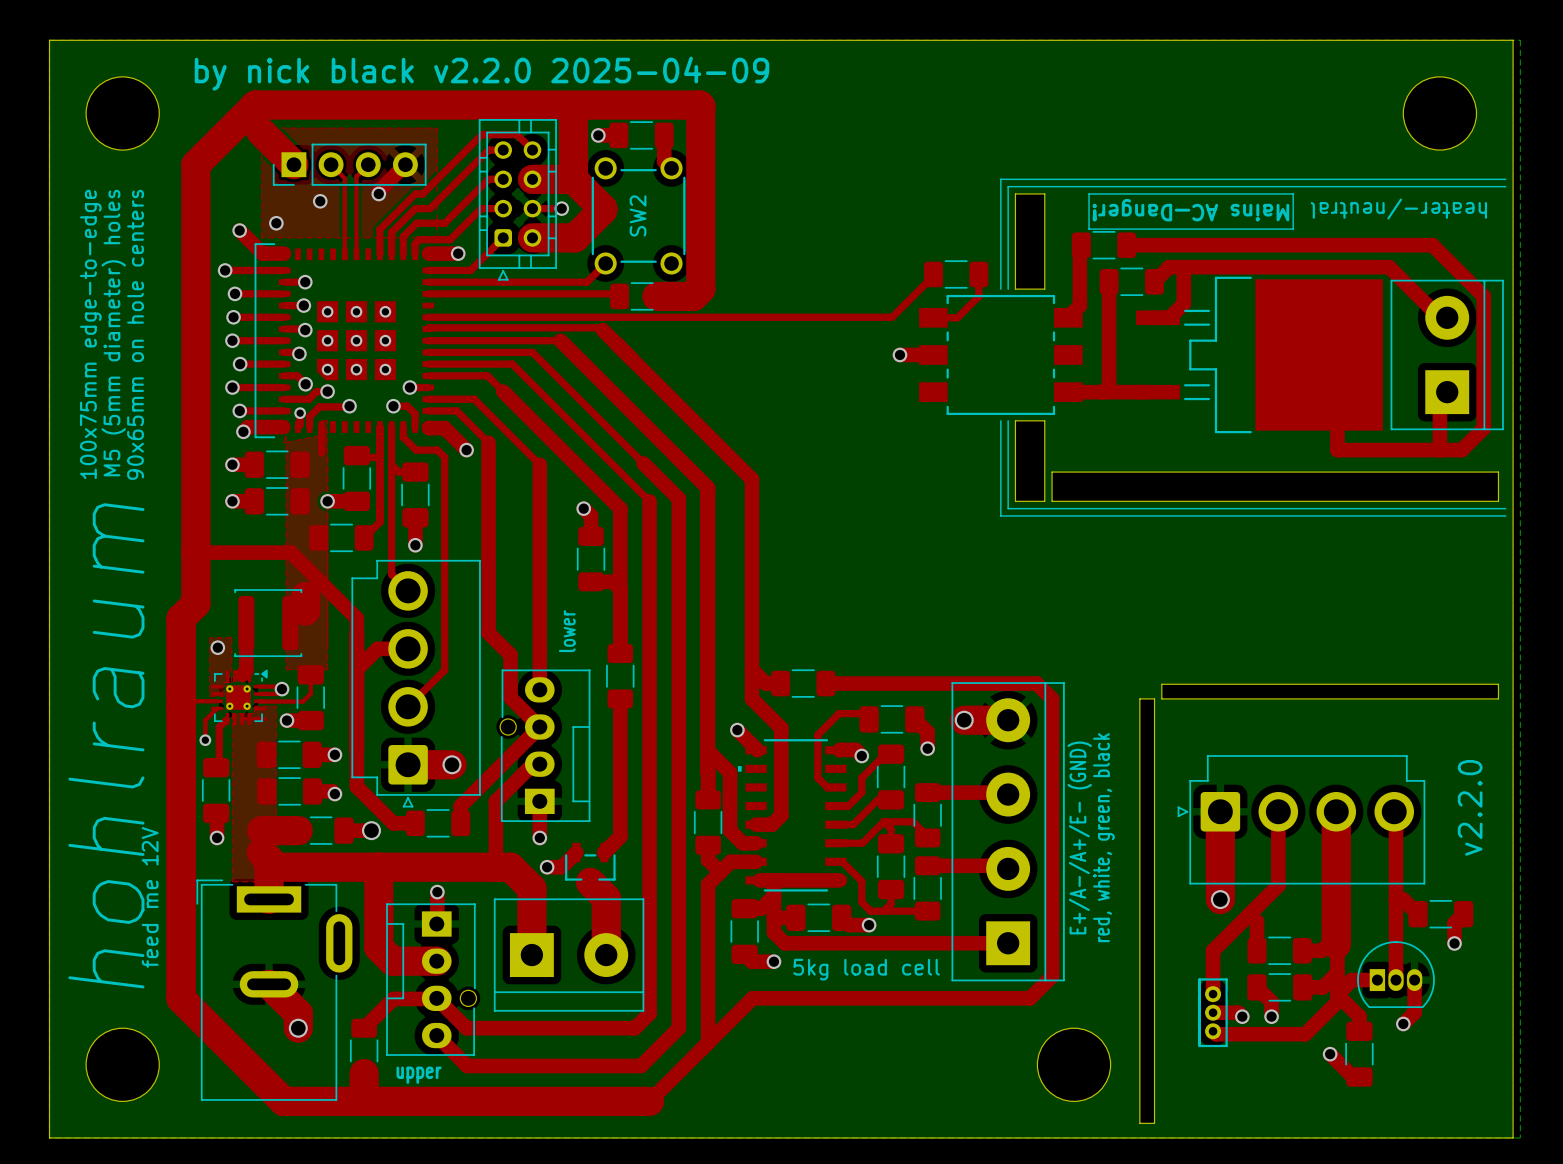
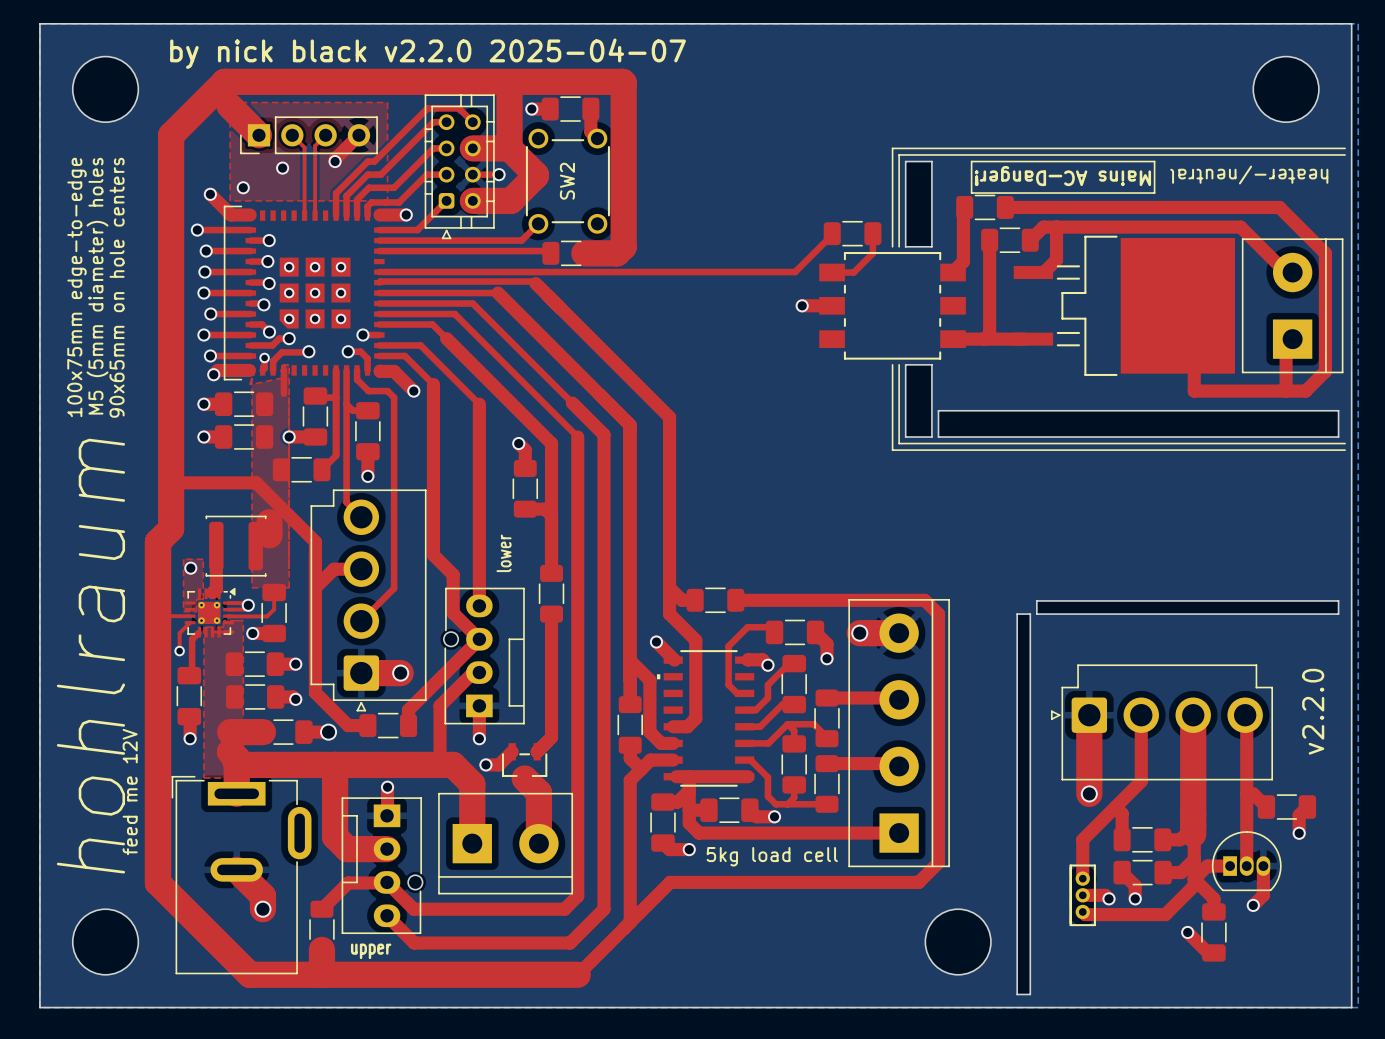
text: by nick black v2.2.0 2025-04-09 (481, 73) -> by nick black v2.2.0 2025-04-07 (428, 53)
text: E+/A-/A+/E- (GND) (1079, 837) -> none
text: red, white, green, black (1103, 837) -> none

